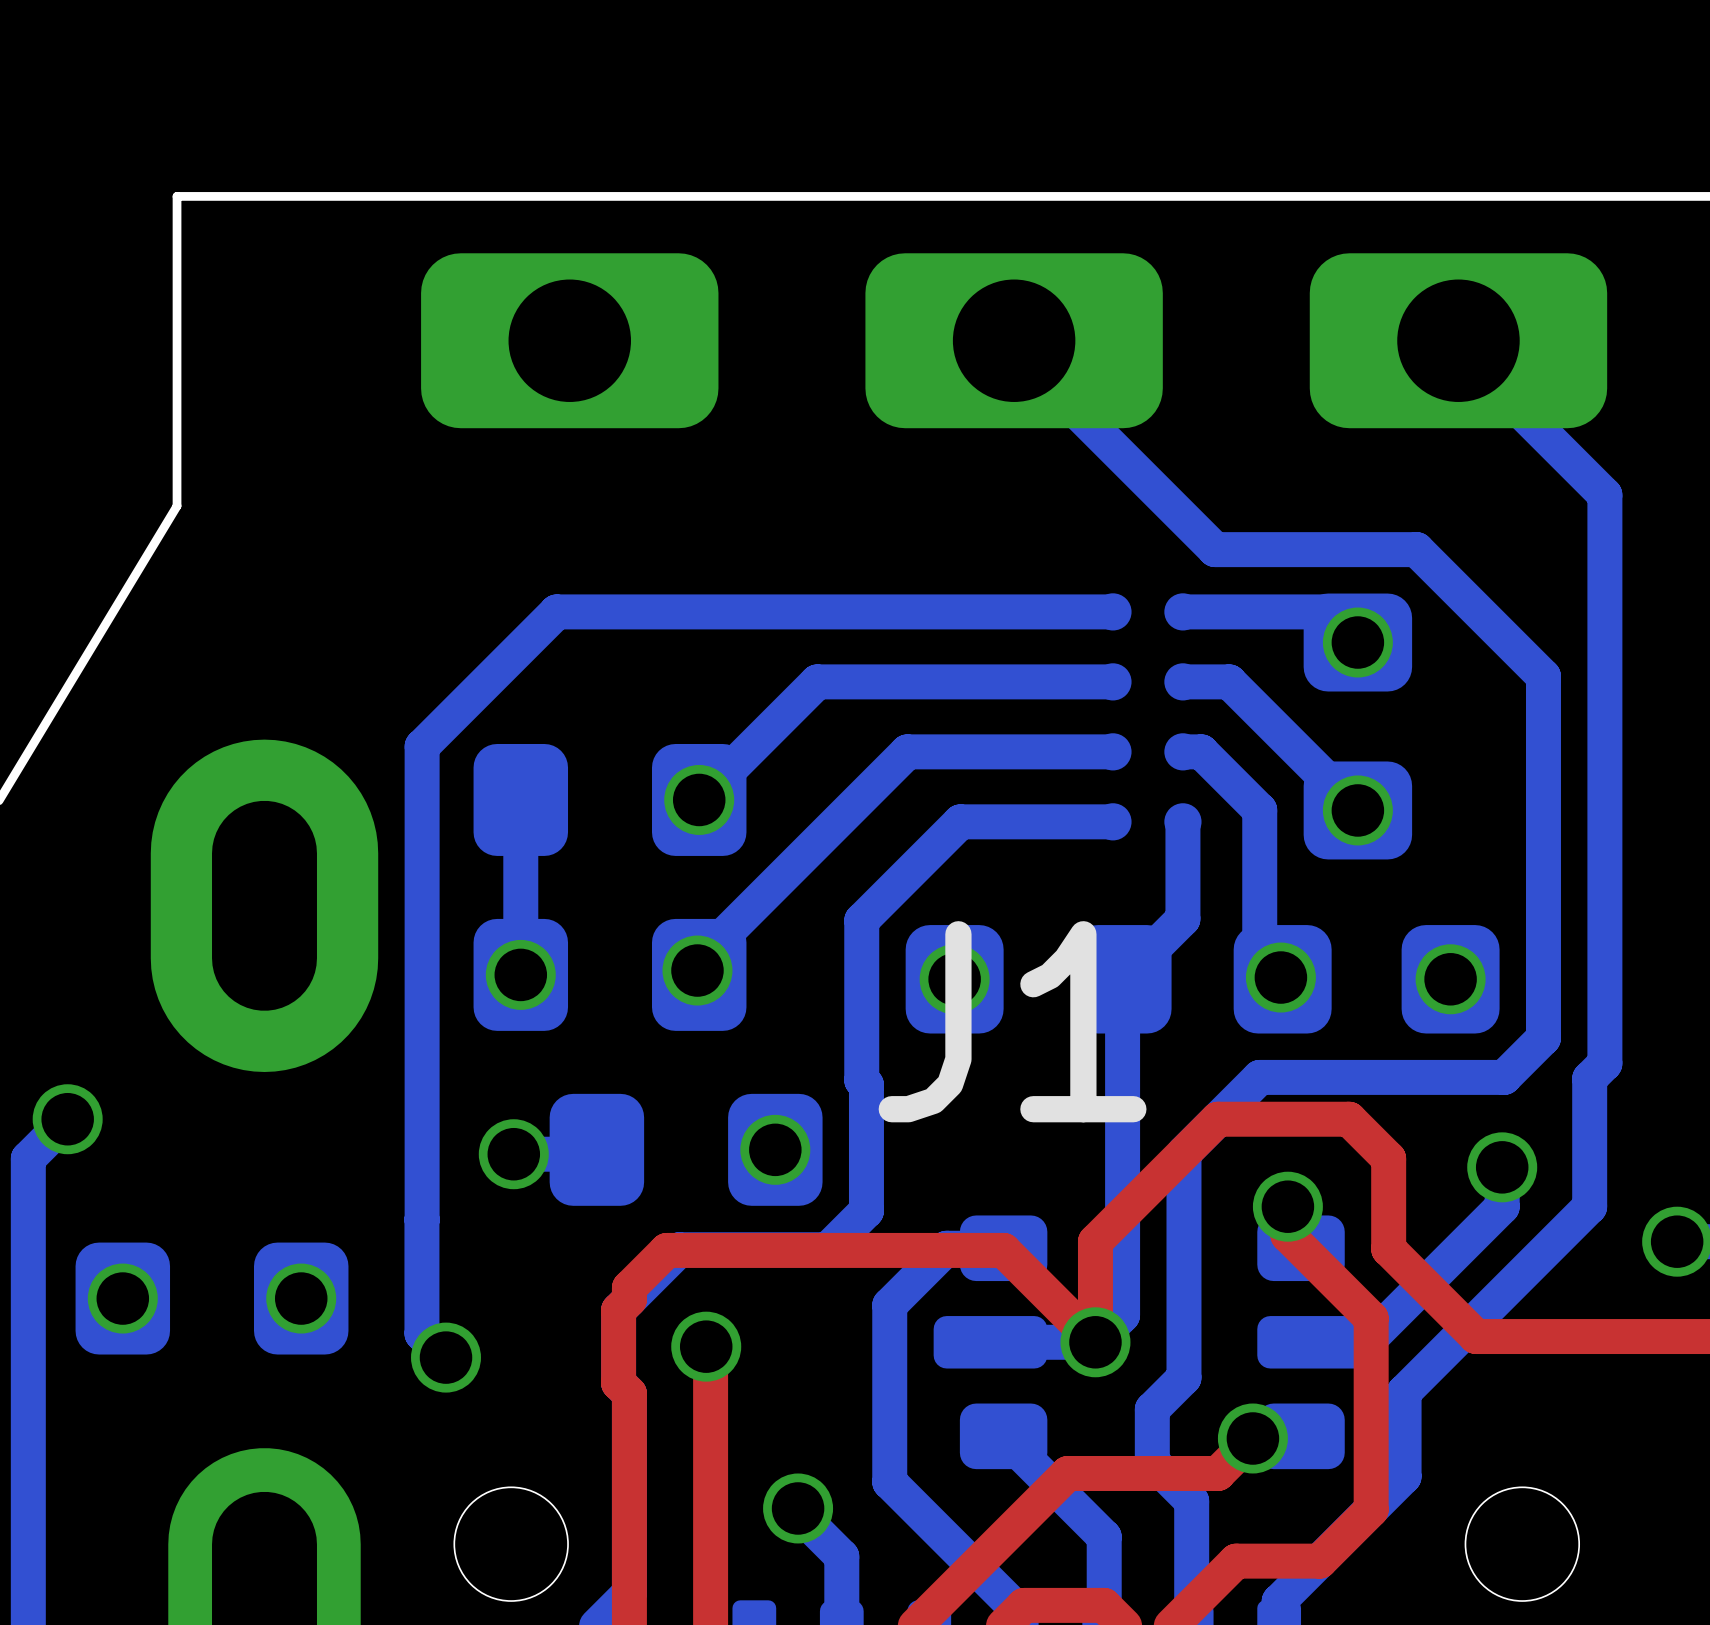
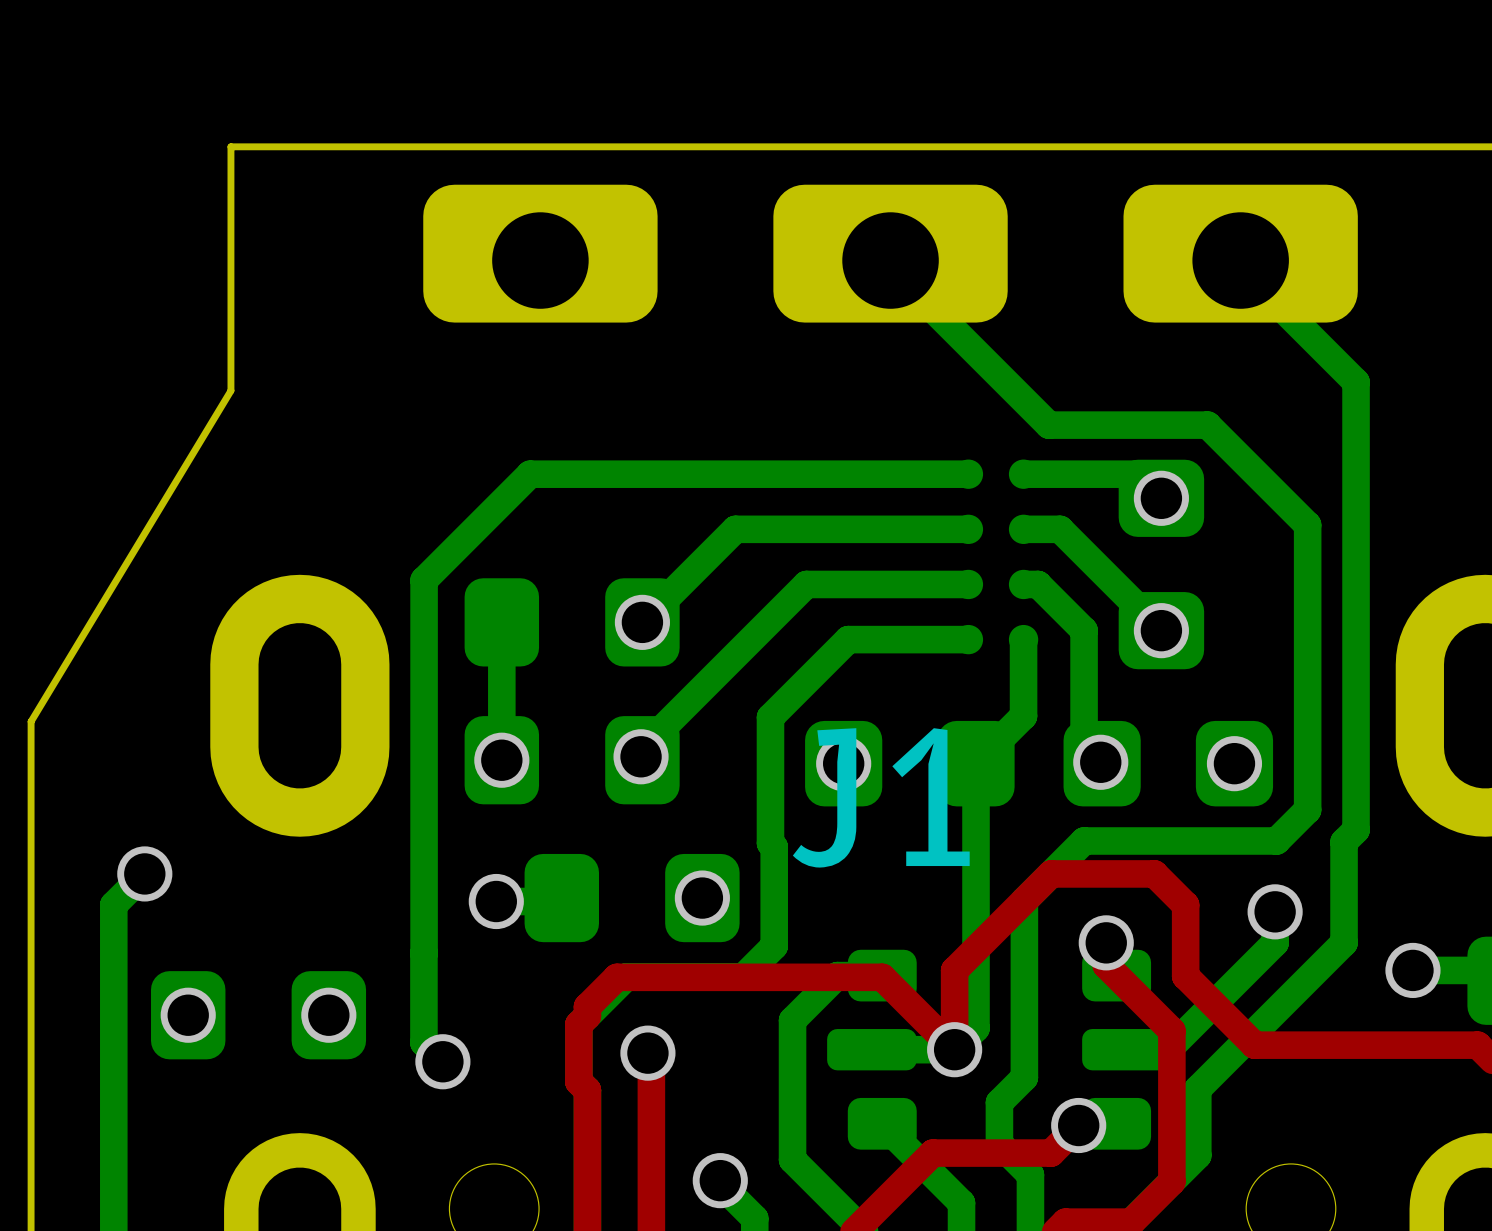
part footprint: [421, 253, 1608, 429] -> [423, 184, 1358, 323]

